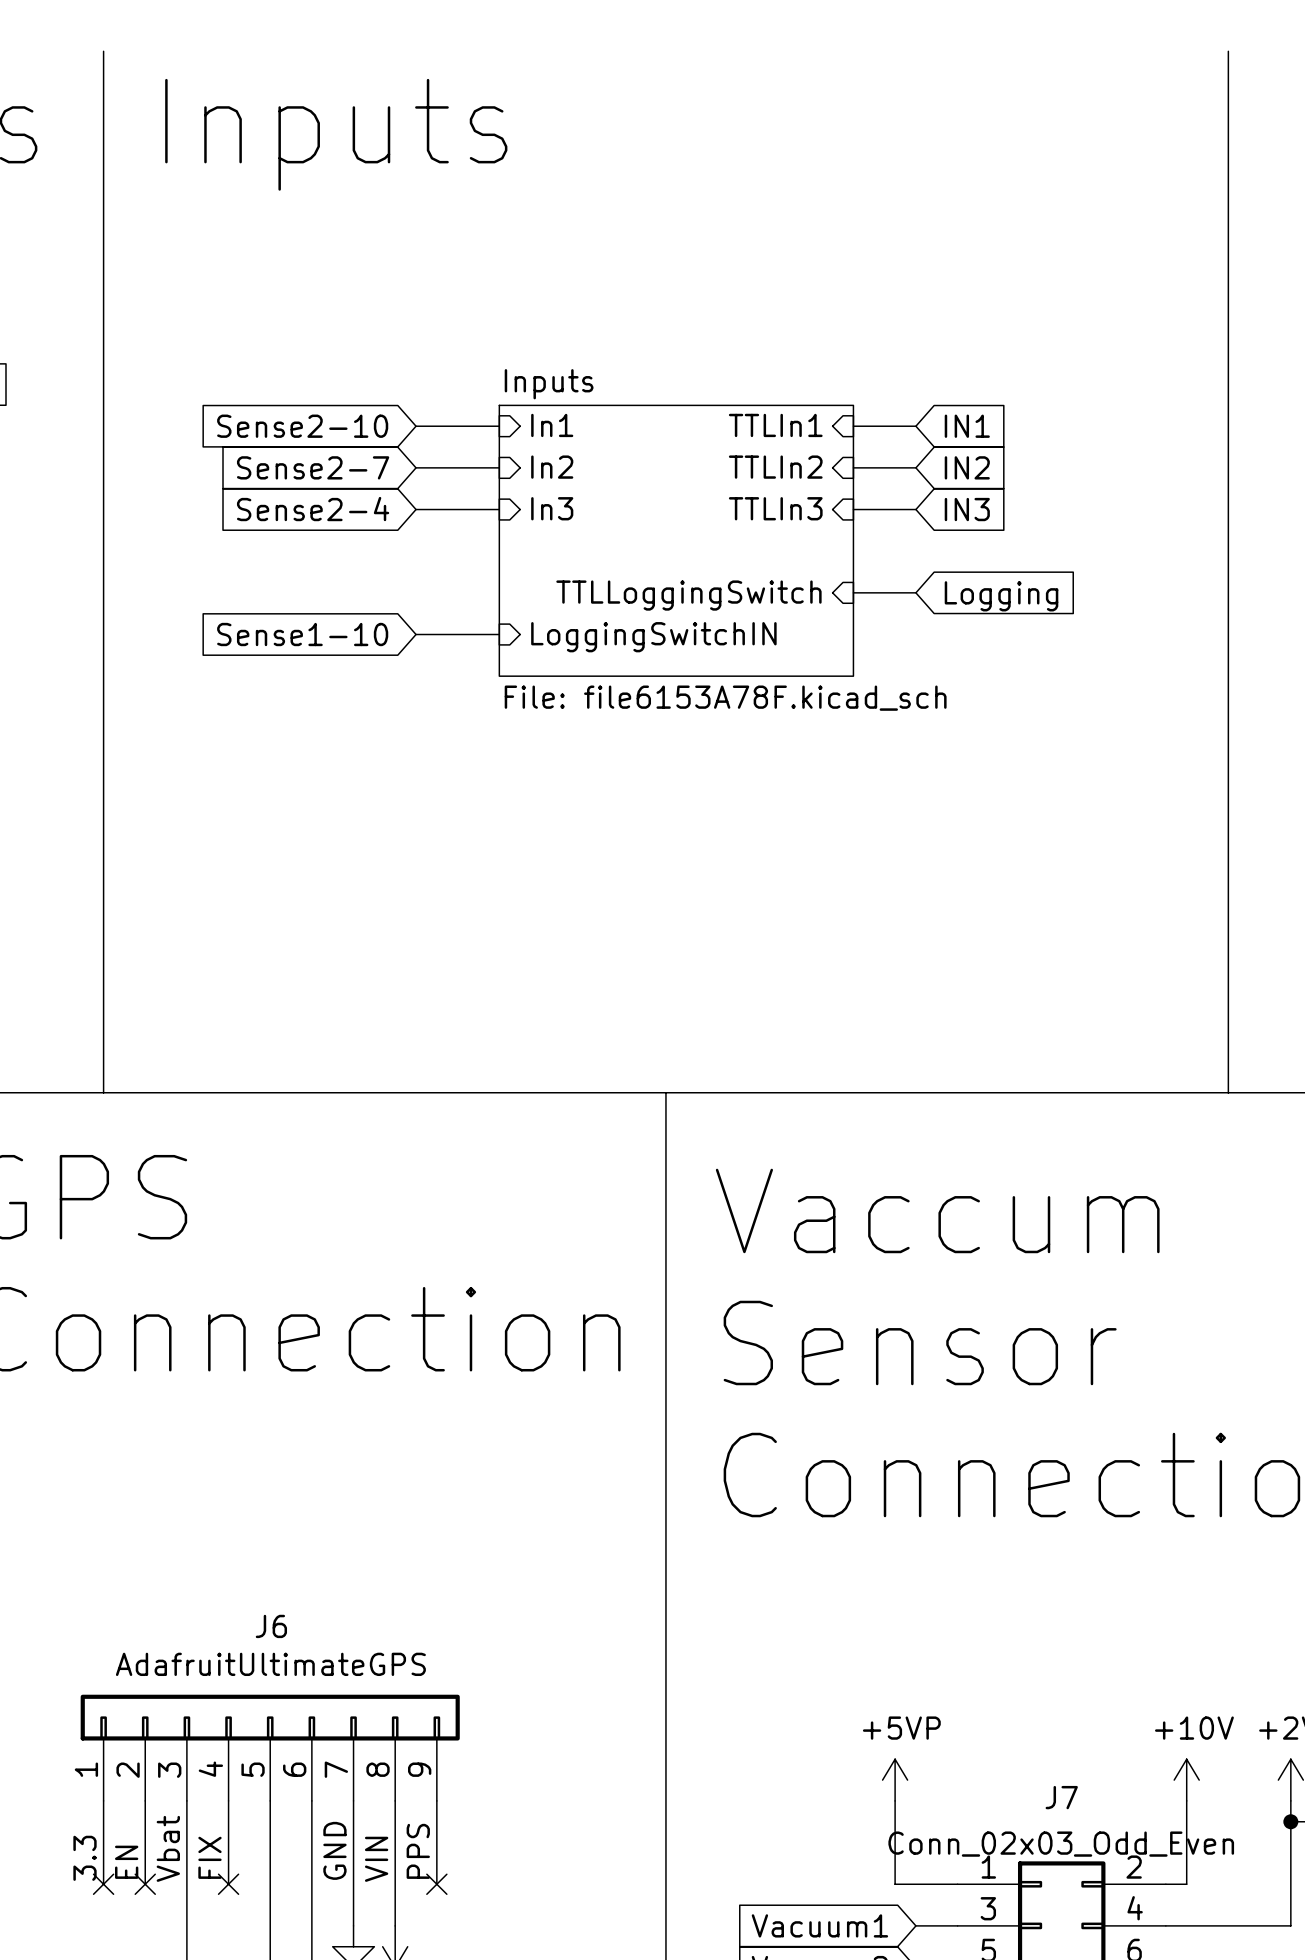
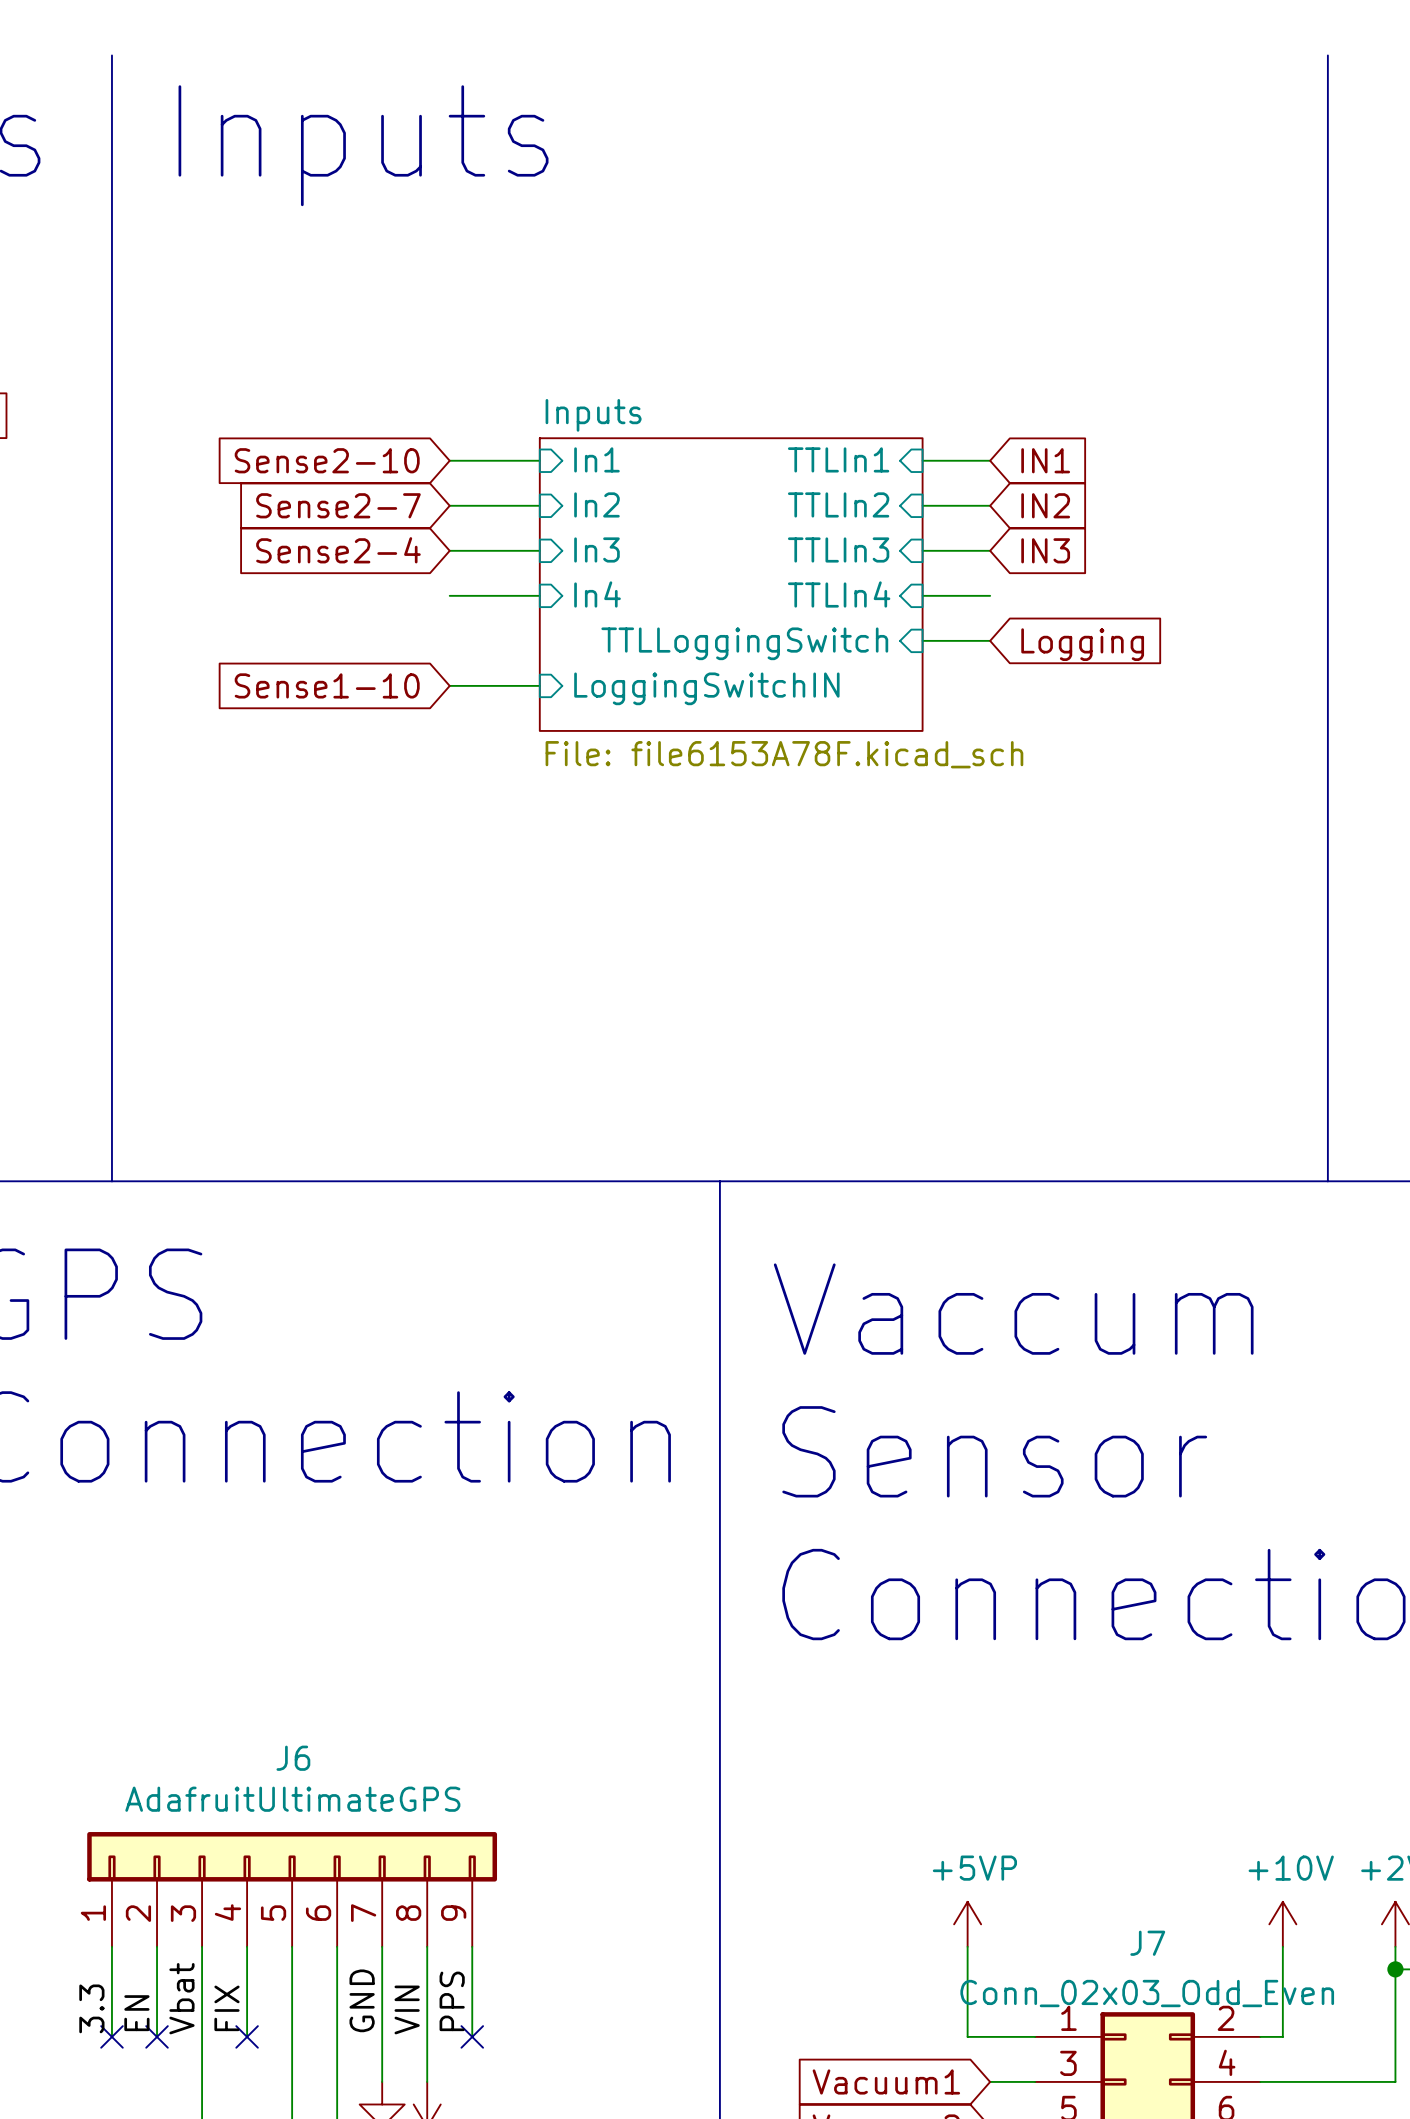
sheet pin: none -> In4 (597, 594)
sheet pin: none -> TTLIn4 (839, 594)
wire: none -> (449, 595) (539, 595)
wire: none -> (922, 595) (990, 595)

